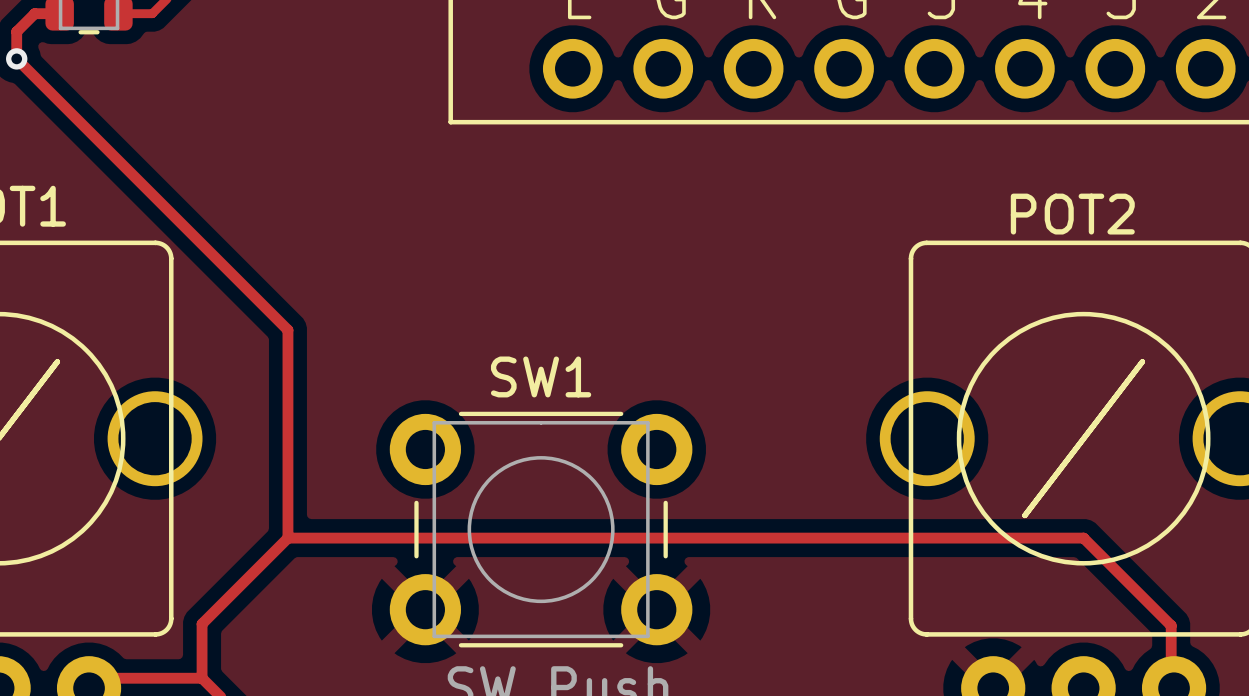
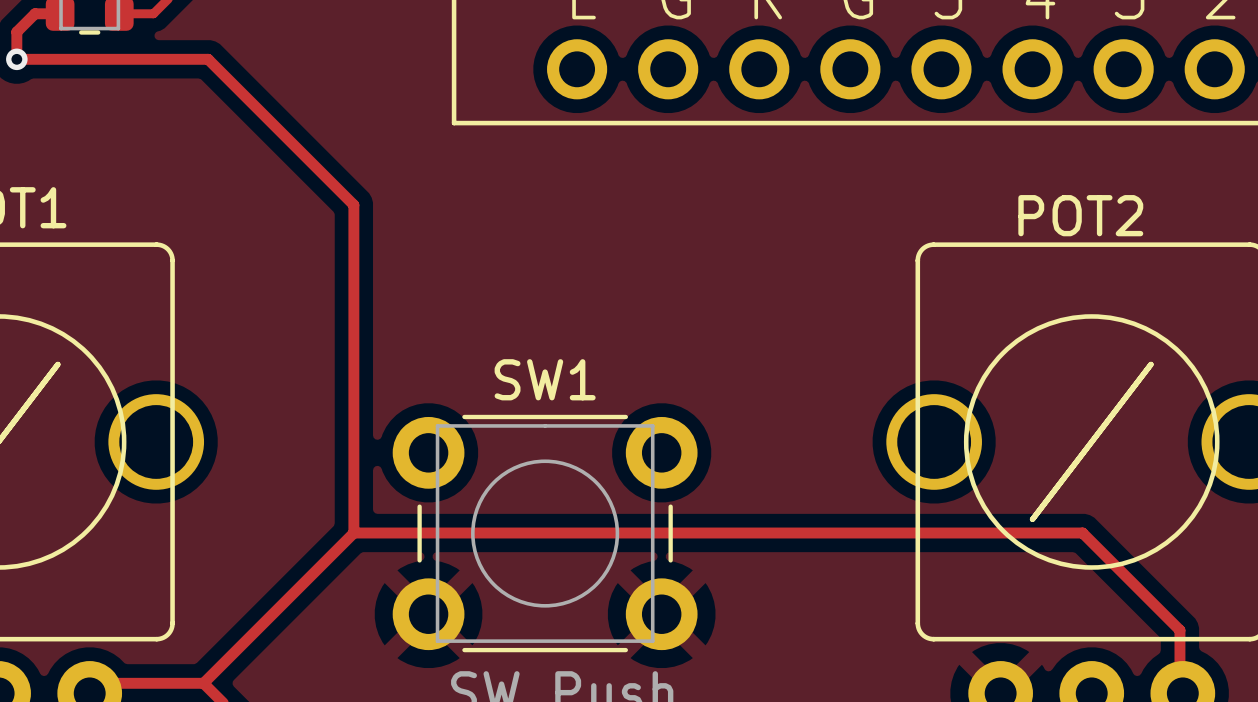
track: (16, 58) (287, 330) (287, 538) -> (16, 59) (208, 59) (353, 205) (353, 533)
track: (287, 538) (1083, 538) -> (353, 533) (1082, 533) (1091, 542)
track: (287, 538) (202, 623) (202, 678) -> (353, 533) (203, 683)

